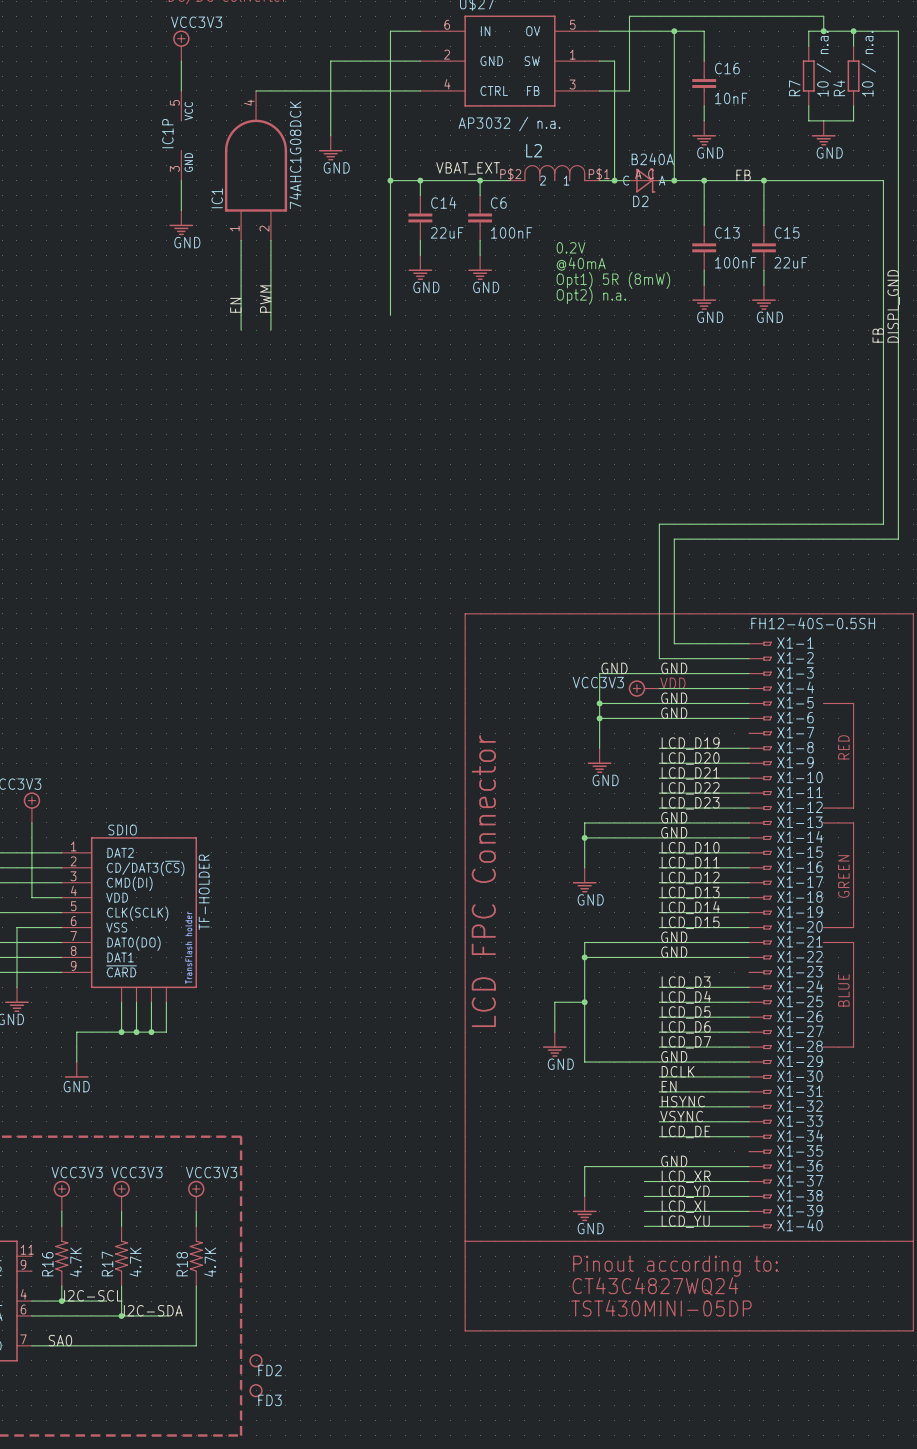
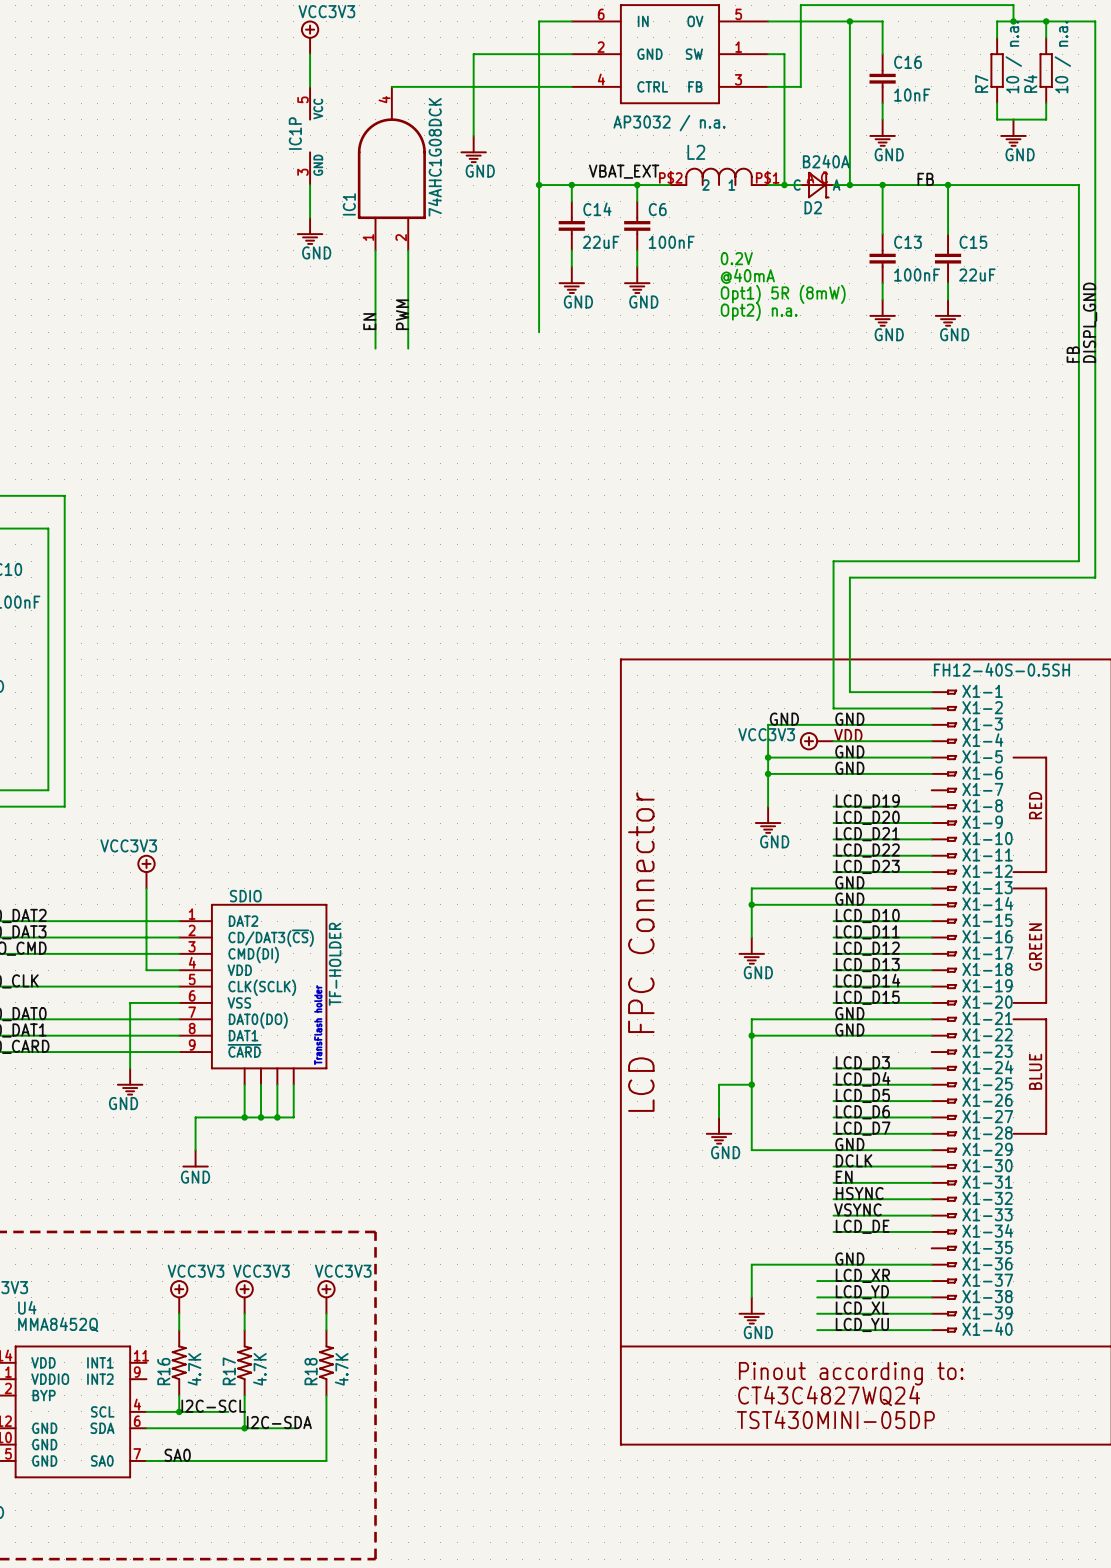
FD2: (256, 1360) -> none
FD3: (256, 1390) -> none

